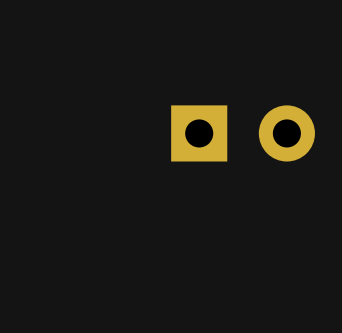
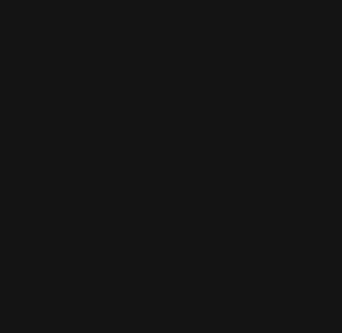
part: (243, 133) -> none

